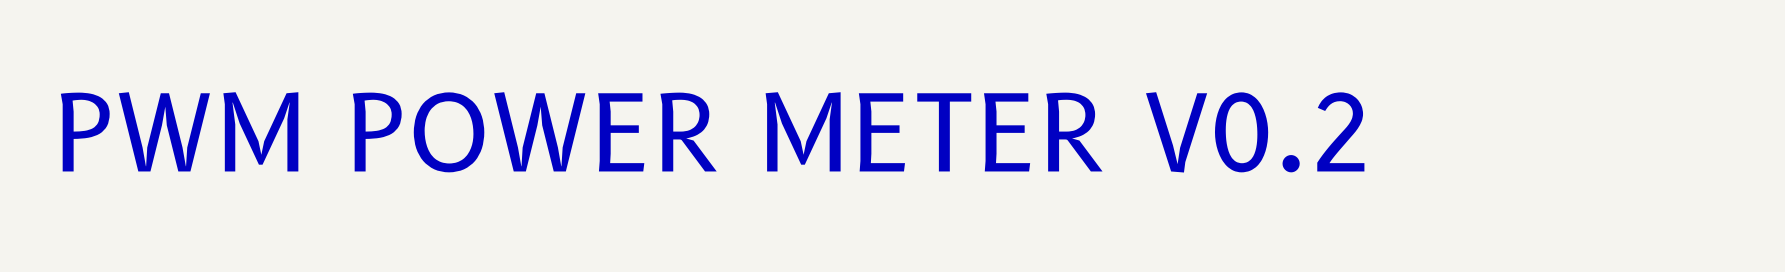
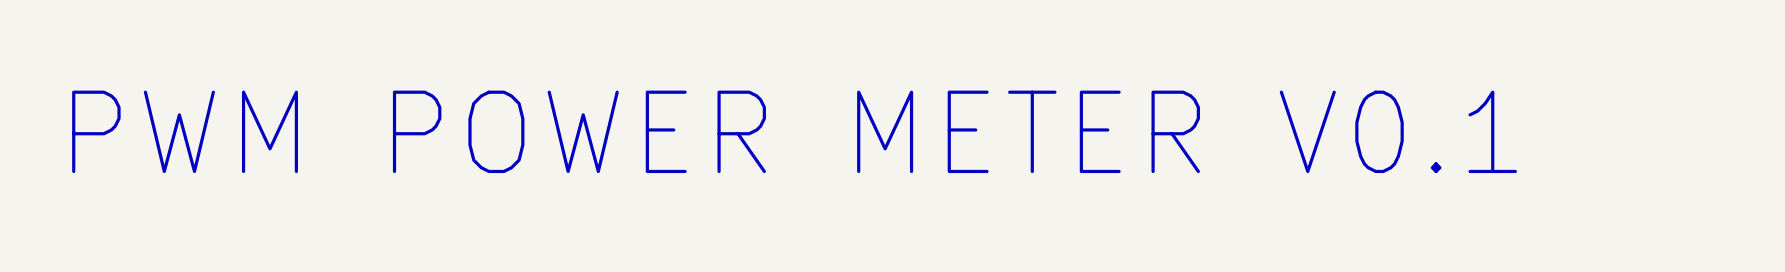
text: PWM POWER METER V0.2 (712, 132) -> PWM POWER METER V0.1 (794, 131)

